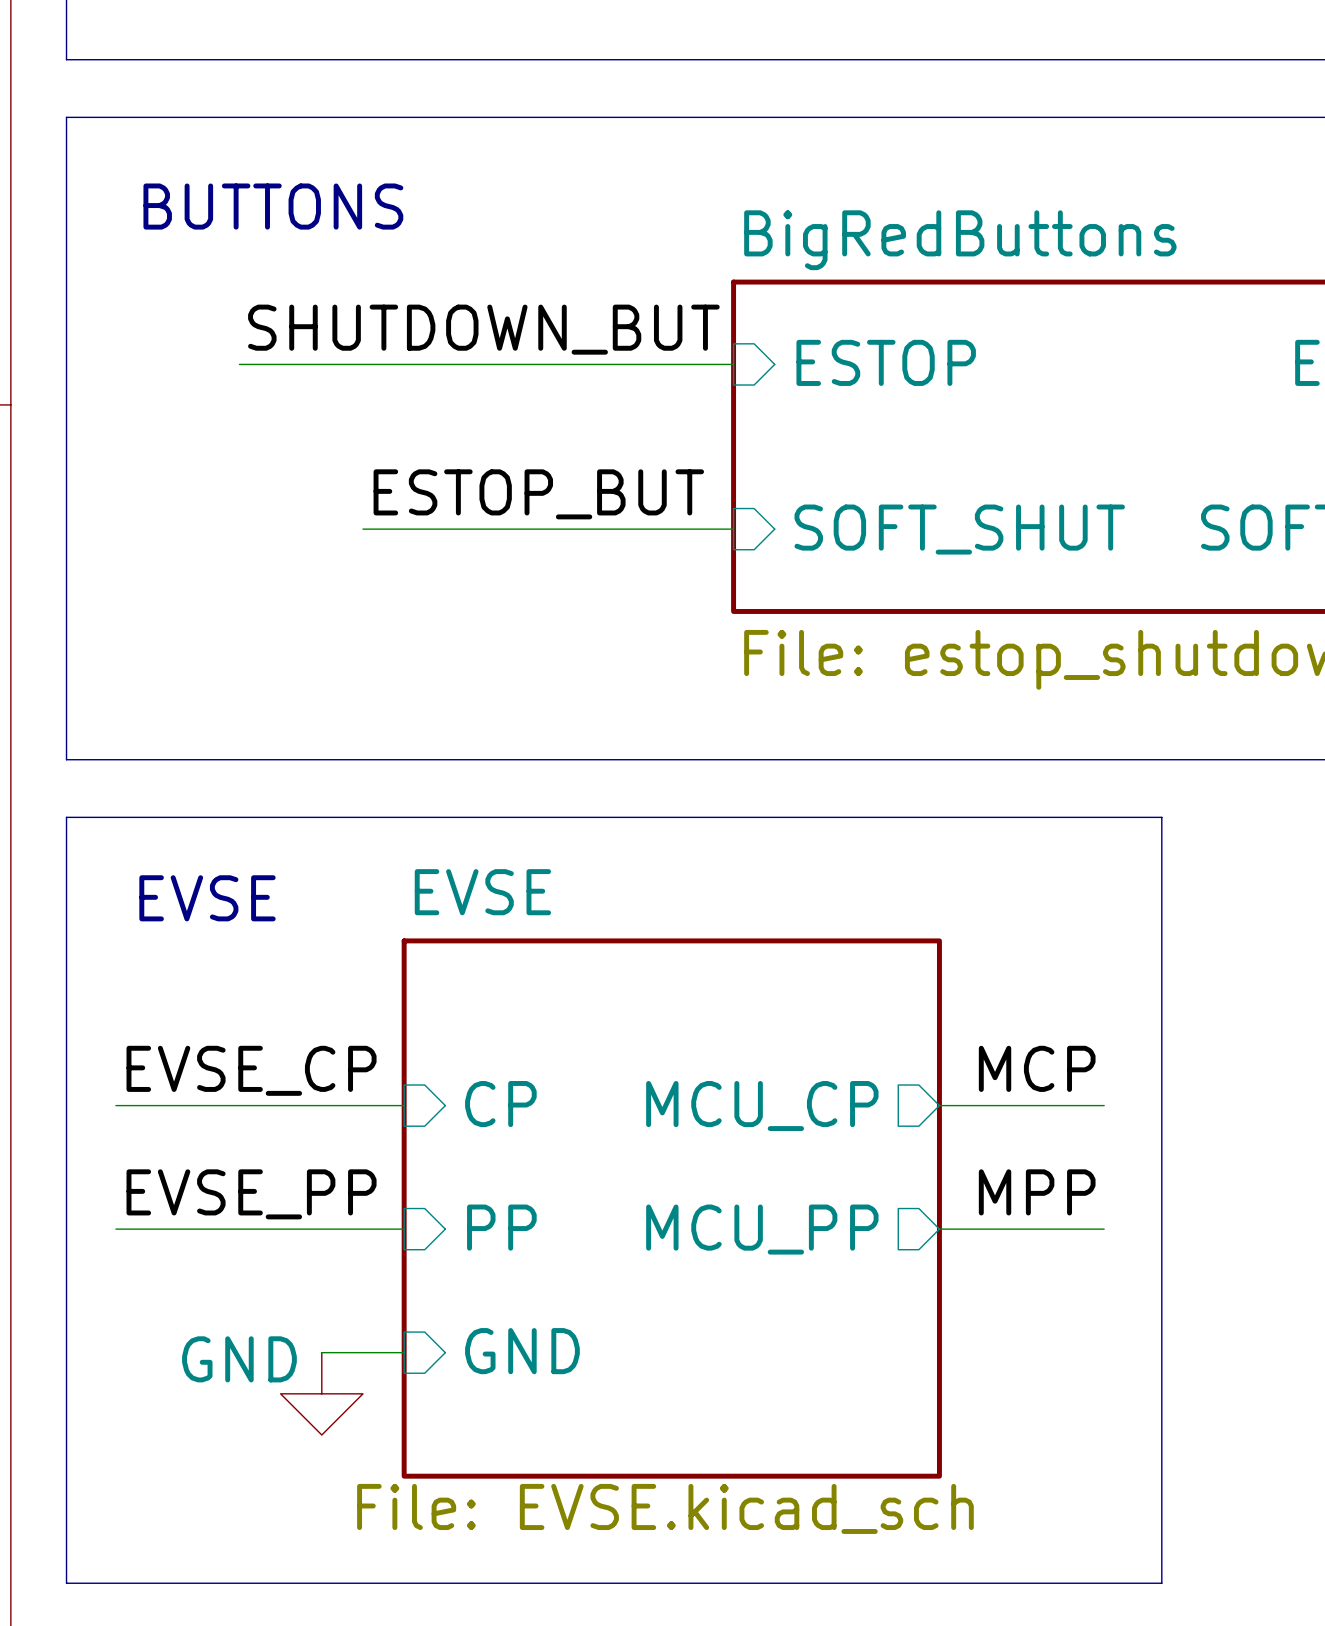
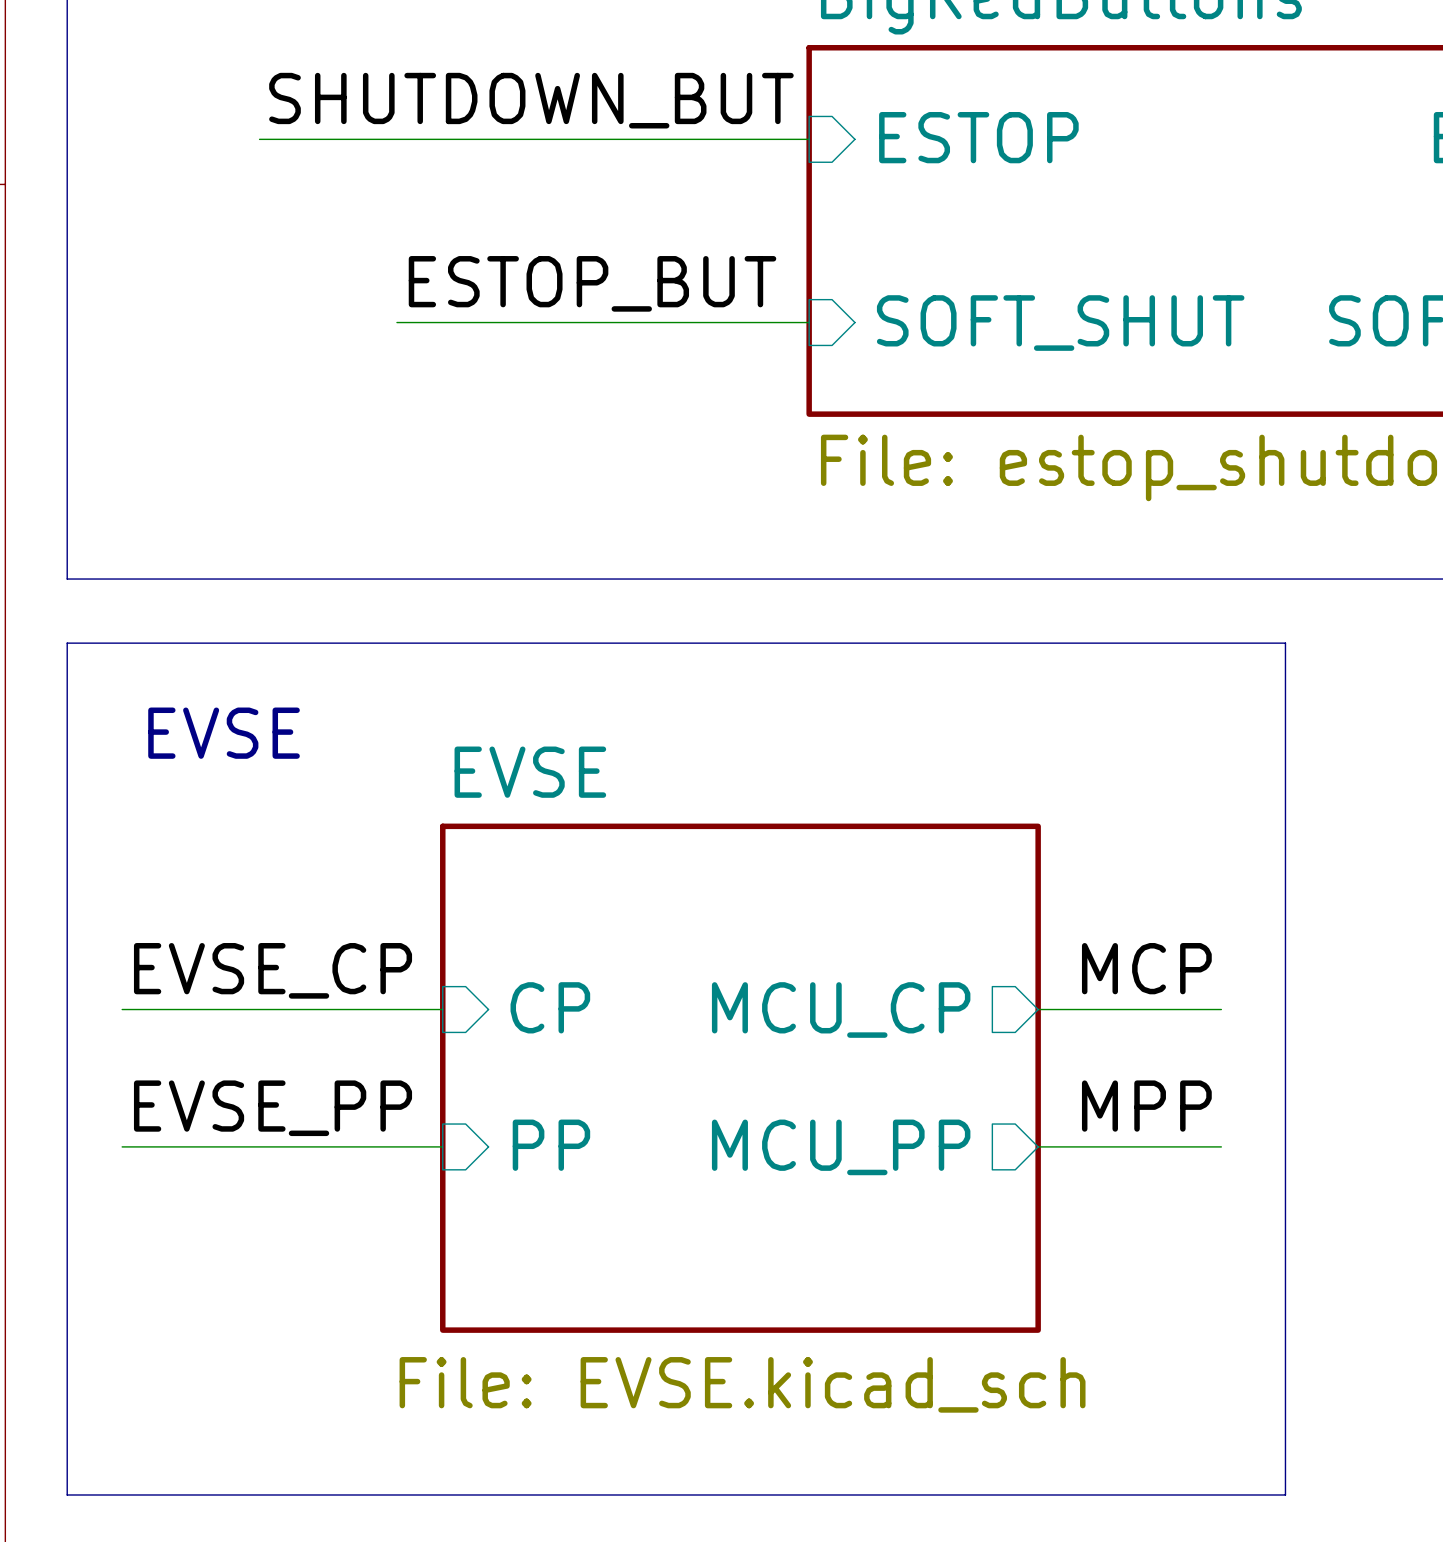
sheet EVSE shape: [401, 938, 942, 1479] -> [440, 823, 1041, 1333]
label position: MCP (1037, 1068) -> MCP (1146, 968)
label position: EVSE_CP (251, 1070) -> EVSE_CP (273, 970)
sheet pin position: CP (500, 1104) -> CP (550, 1007)
wire: (115, 1105) (404, 1105) -> (122, 1009) (442, 1009)
wire: (939, 1105) (1104, 1105) -> (1038, 1009) (1221, 1009)
sheet pin position: MCU_CP (762, 1106) -> MCU_CP (841, 1009)
label position: MPP (1037, 1192) -> MPP (1146, 1106)
label position: EVSE_PP (251, 1194) -> EVSE_PP (273, 1108)
sheet pin position: PP (501, 1227) -> PP (551, 1145)
wire: (115, 1229) (404, 1229) -> (122, 1146) (442, 1146)
sheet pin position: MCU_PP (762, 1229) -> MCU_PP (841, 1147)
wire: (939, 1229) (1104, 1229) -> (1038, 1146) (1221, 1146)
sheet pin: GND (522, 1351) -> none
wire: (321, 1352) (404, 1352) -> none
power symbol: GND (321, 1393) -> none

